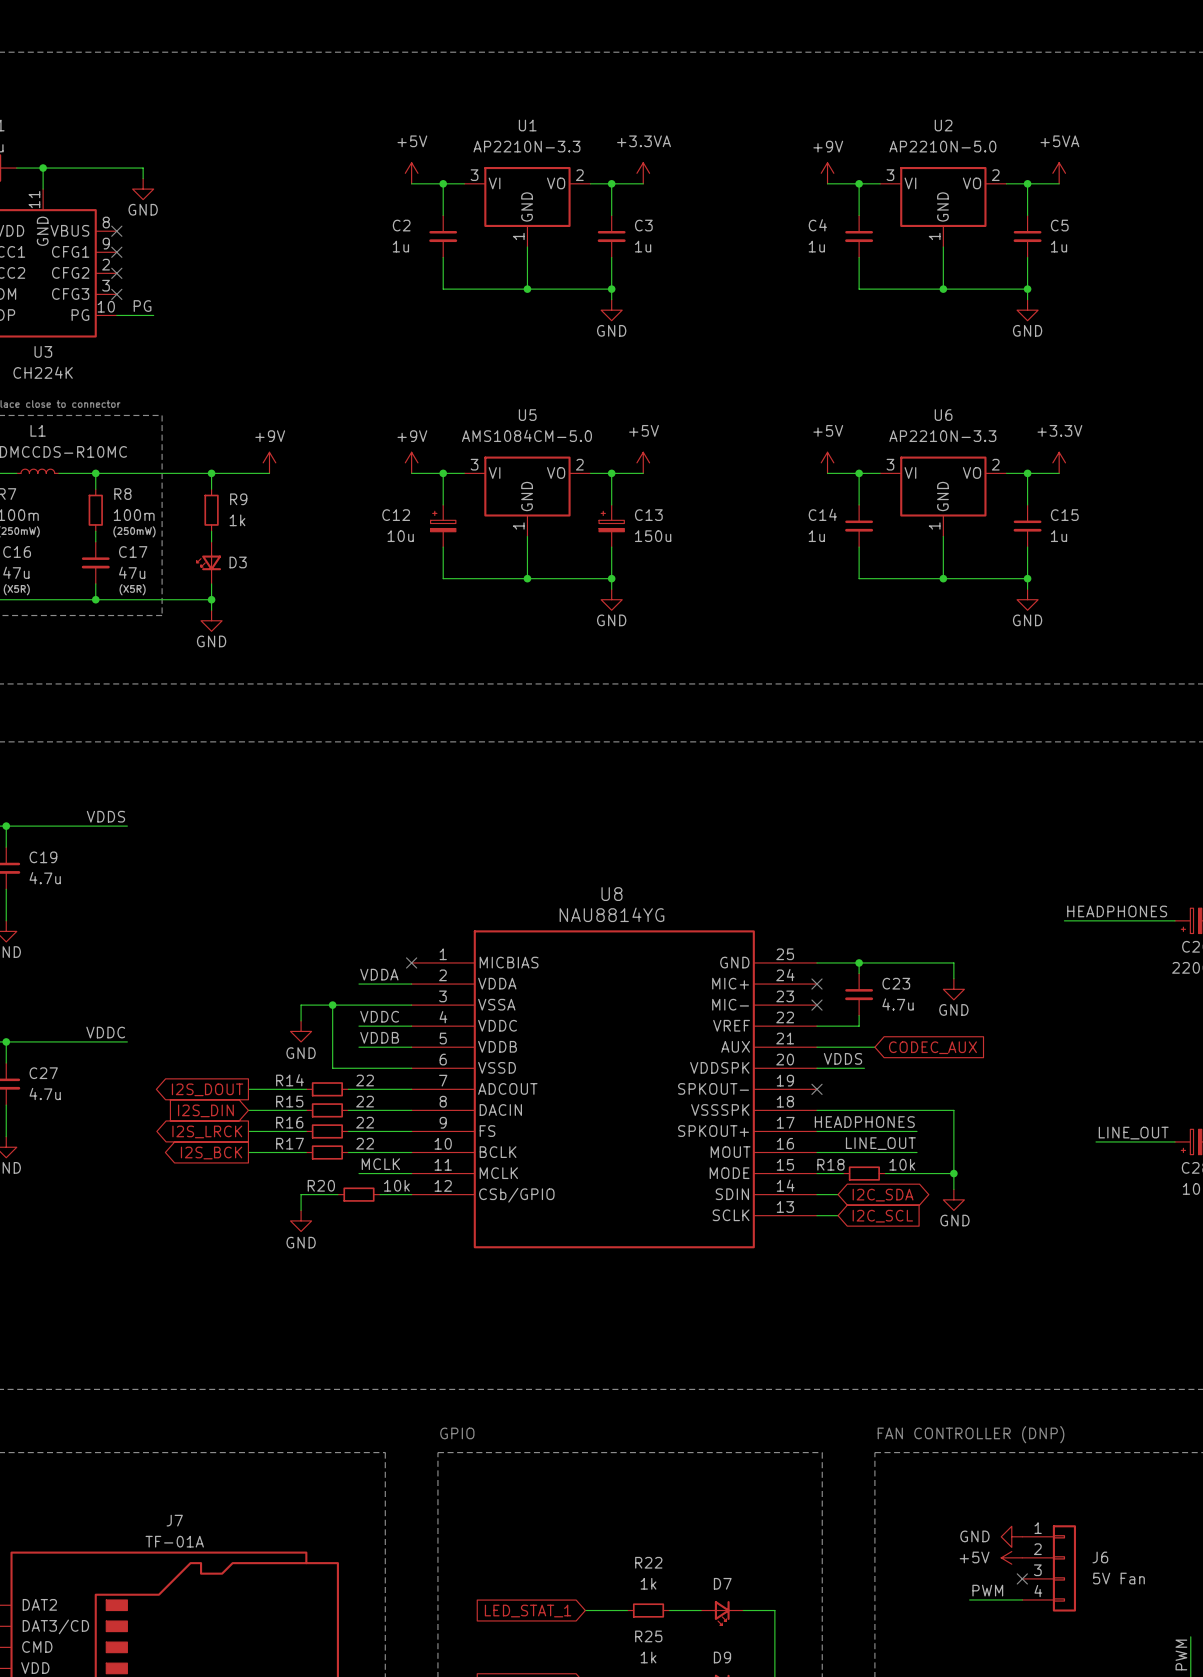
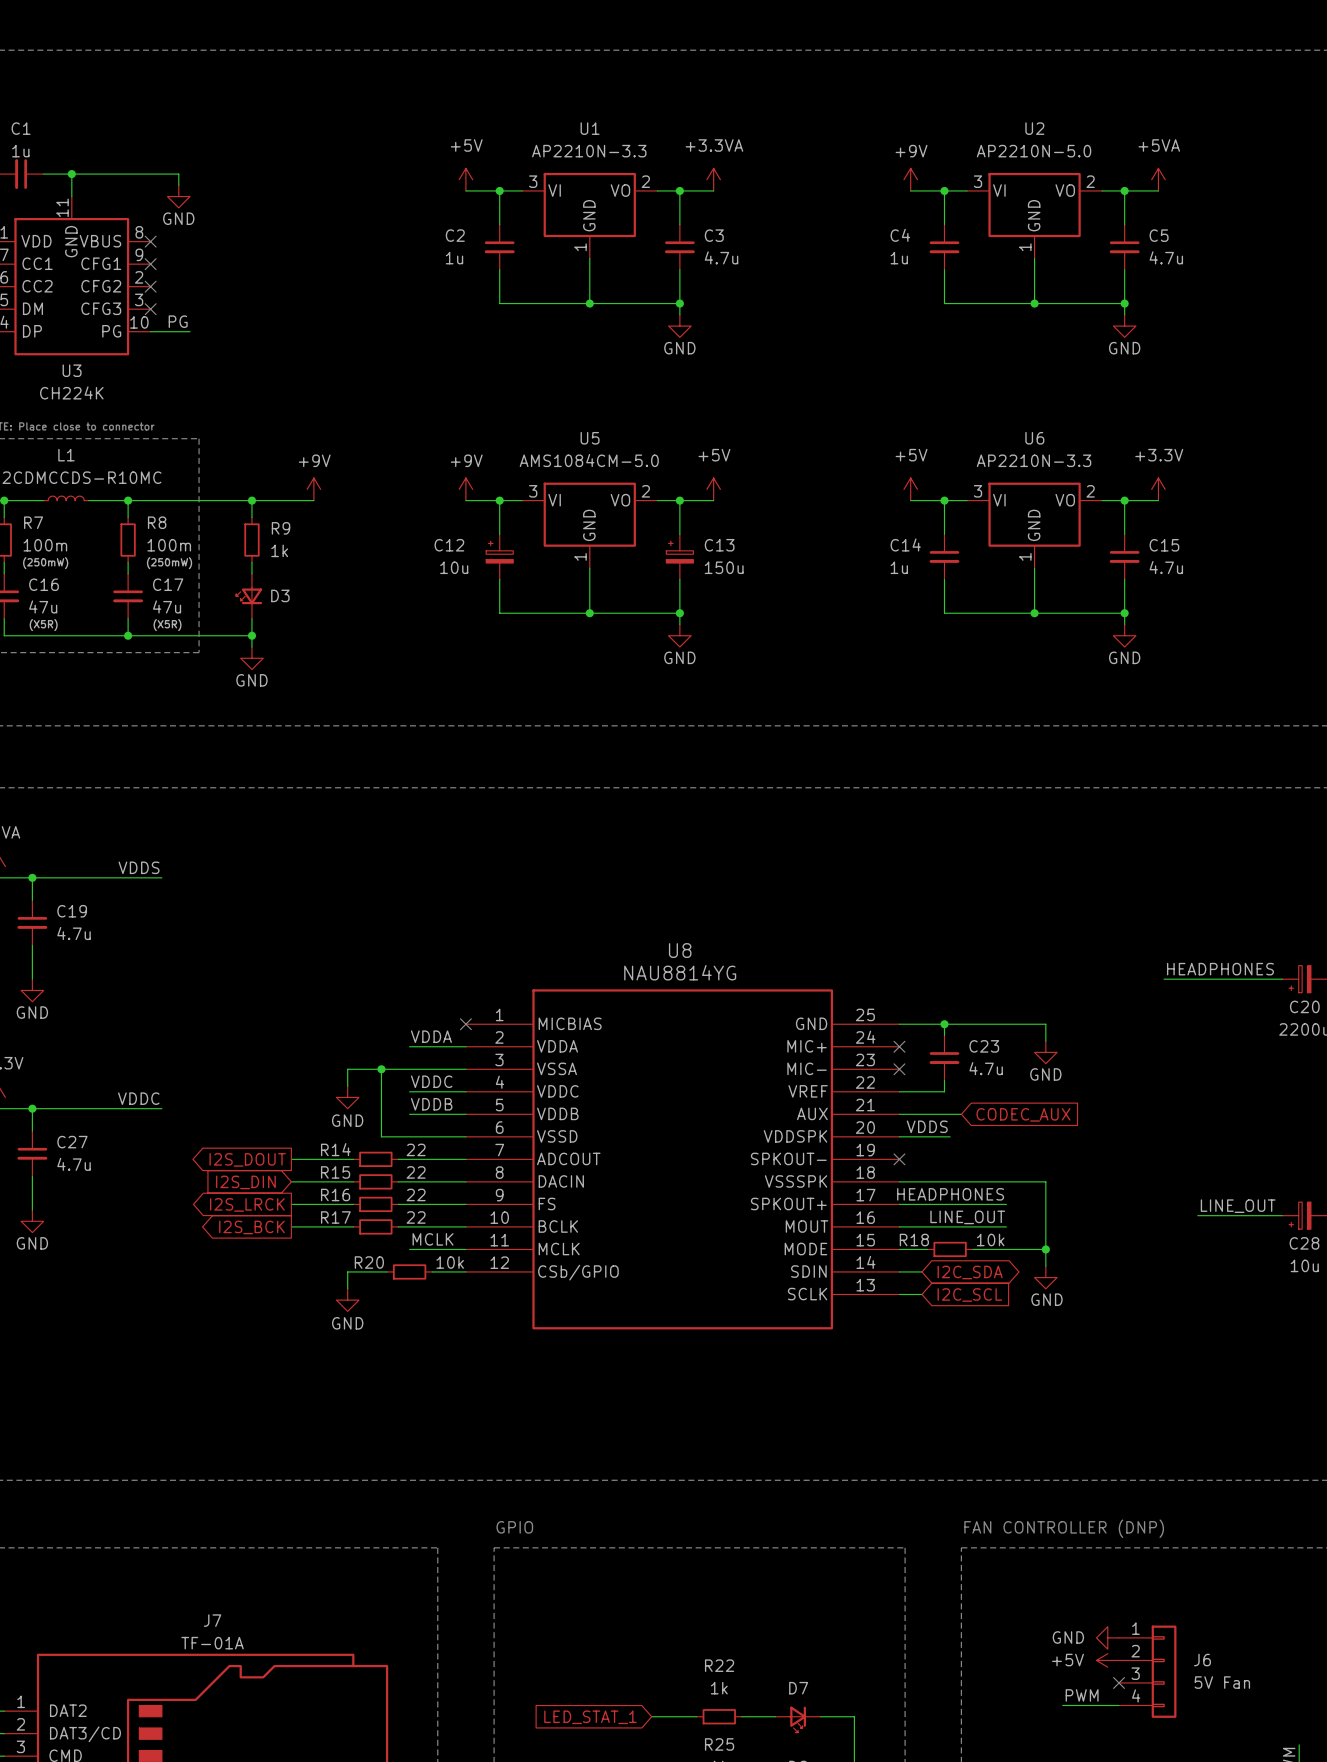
C3 value: 1u (643, 246) -> 4.7u (721, 257)
C5 value: 1u (1058, 246) -> 4.7u (1166, 257)
C15 value: 1u (1058, 536) -> 4.7u (1166, 567)

